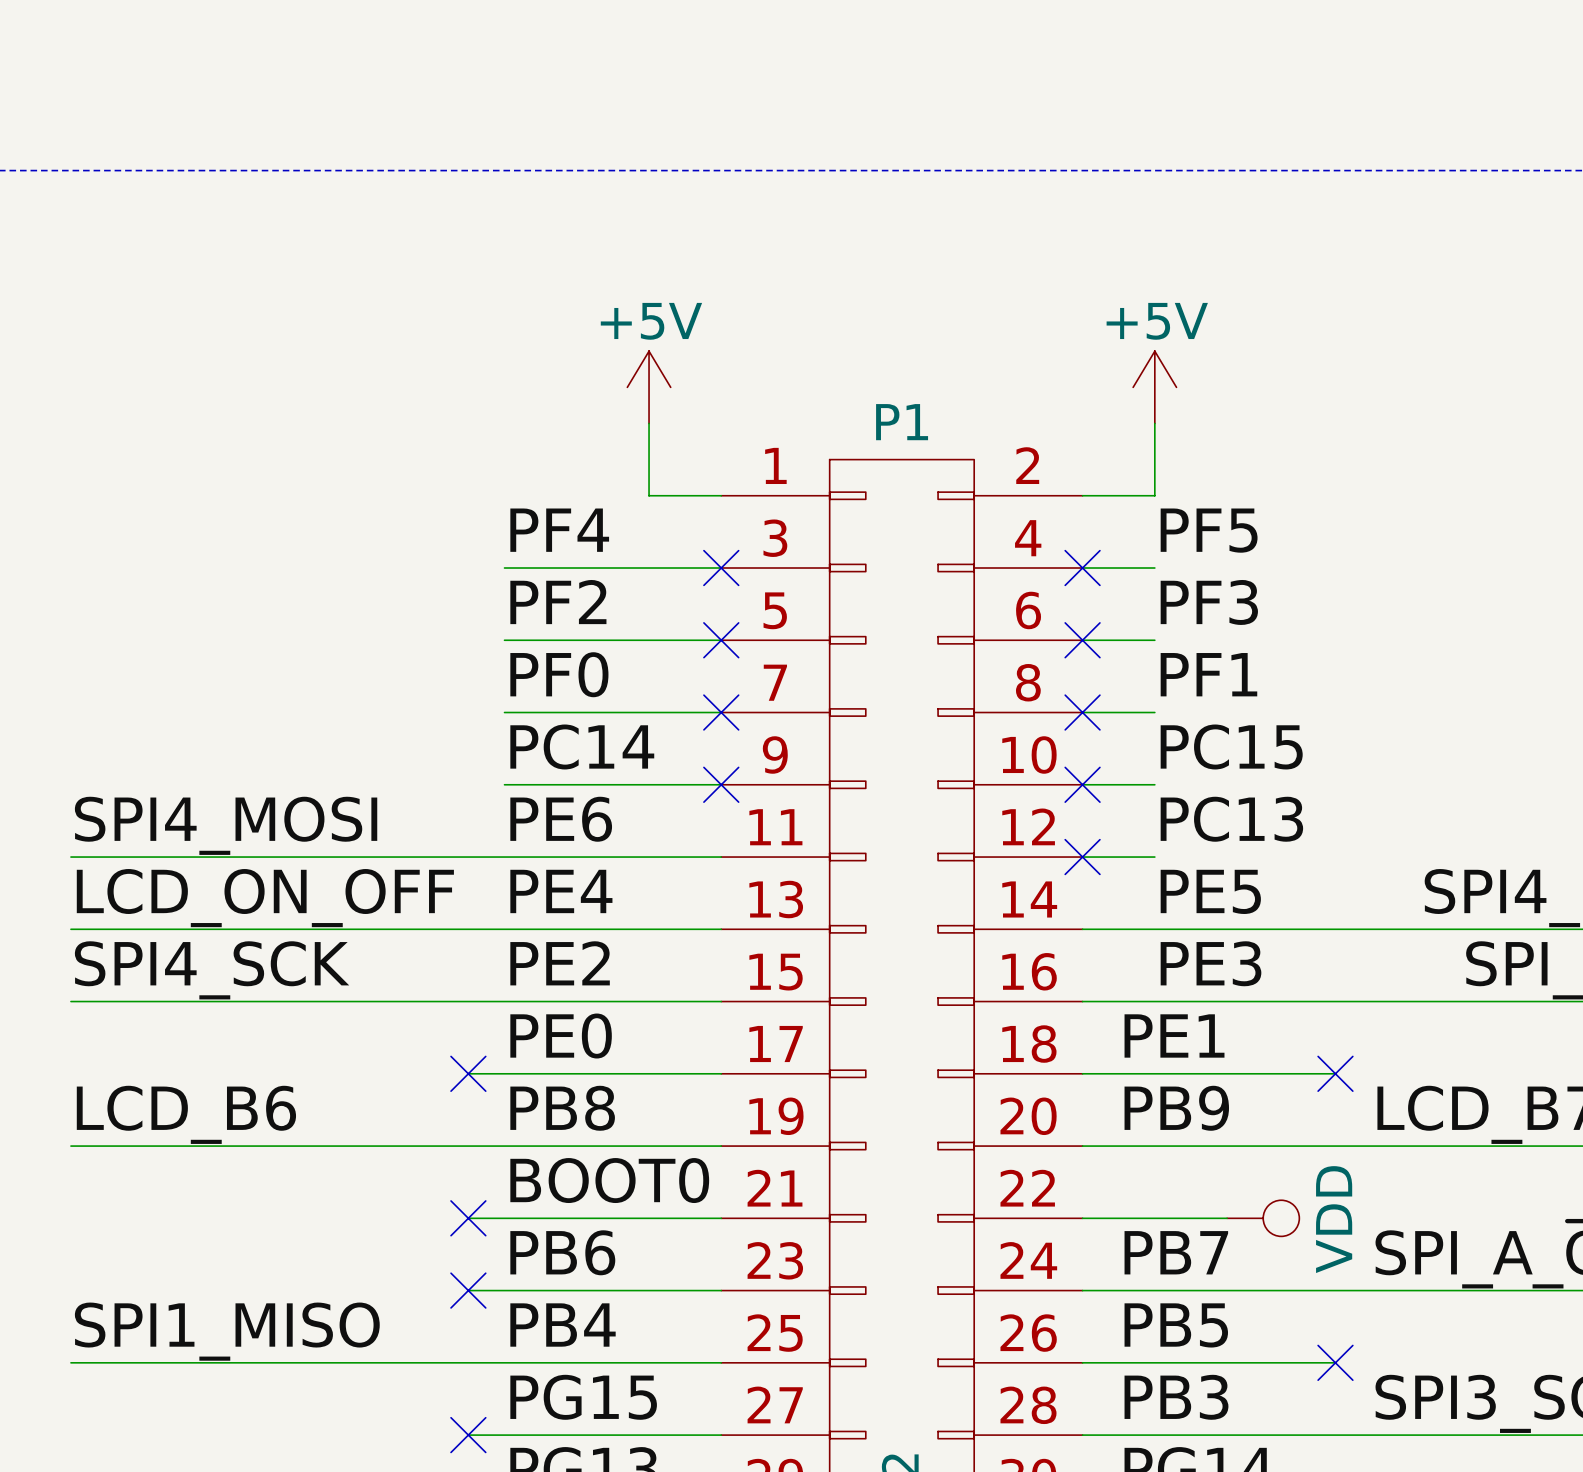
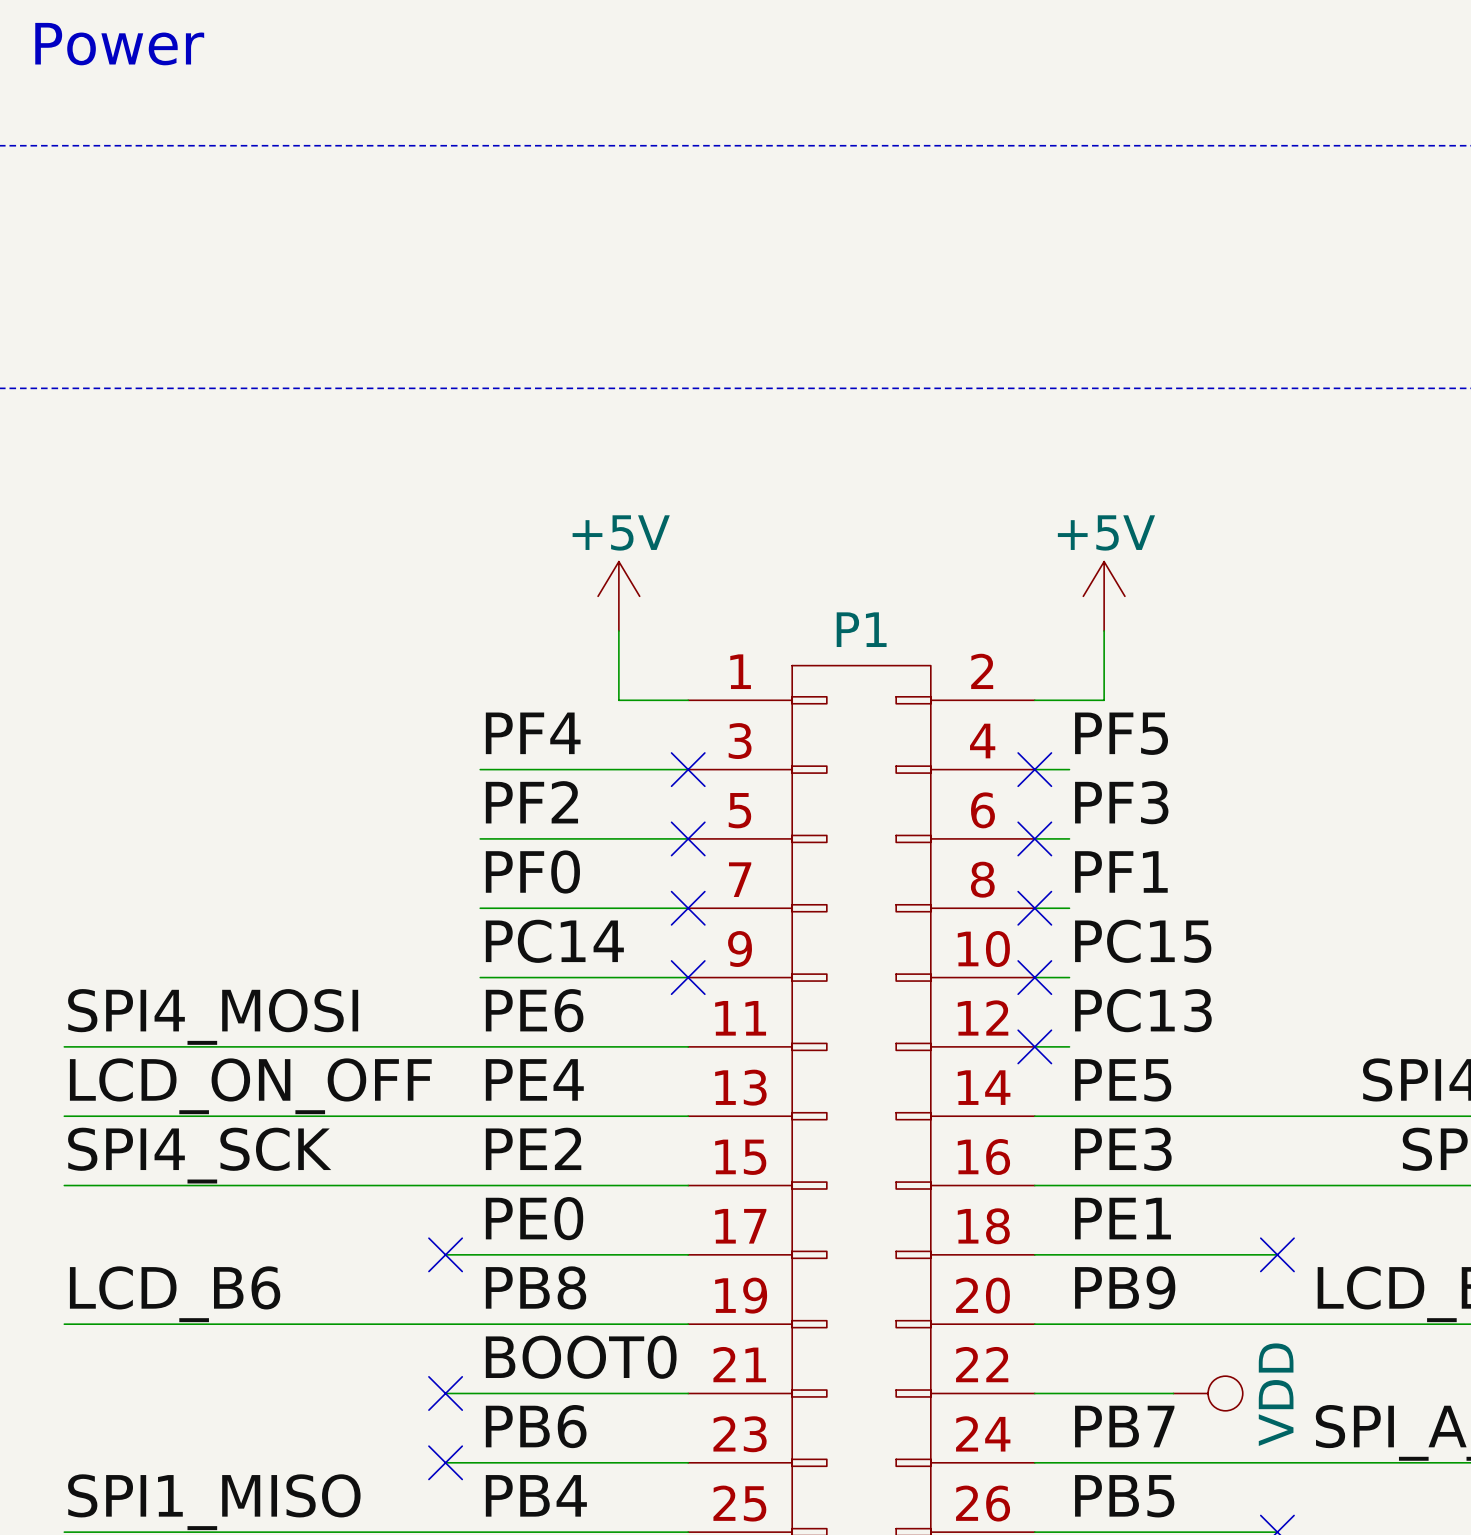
label position: PF5 (1209, 530) -> PF5 (1121, 733)
wire: (1118, 568) (1154, 568) -> none
label position: PF3 (1209, 602) -> PF3 (1121, 802)
wire: (1118, 640) (1154, 640) -> none
label position: PF1 (1208, 674) -> PF1 (1121, 871)
wire: (1118, 712) (1154, 712) -> none
label position: PC15 (1231, 746) -> PC15 (1143, 941)
wire: (1118, 784) (1154, 784) -> none
label position: PC13 (1231, 819) -> PC13 (1143, 1010)
wire: (1118, 857) (1154, 857) -> none
label position: PE5 (1210, 891) -> PE5 (1123, 1080)
label position: PE3 (1211, 963) -> PE3 (1123, 1149)

